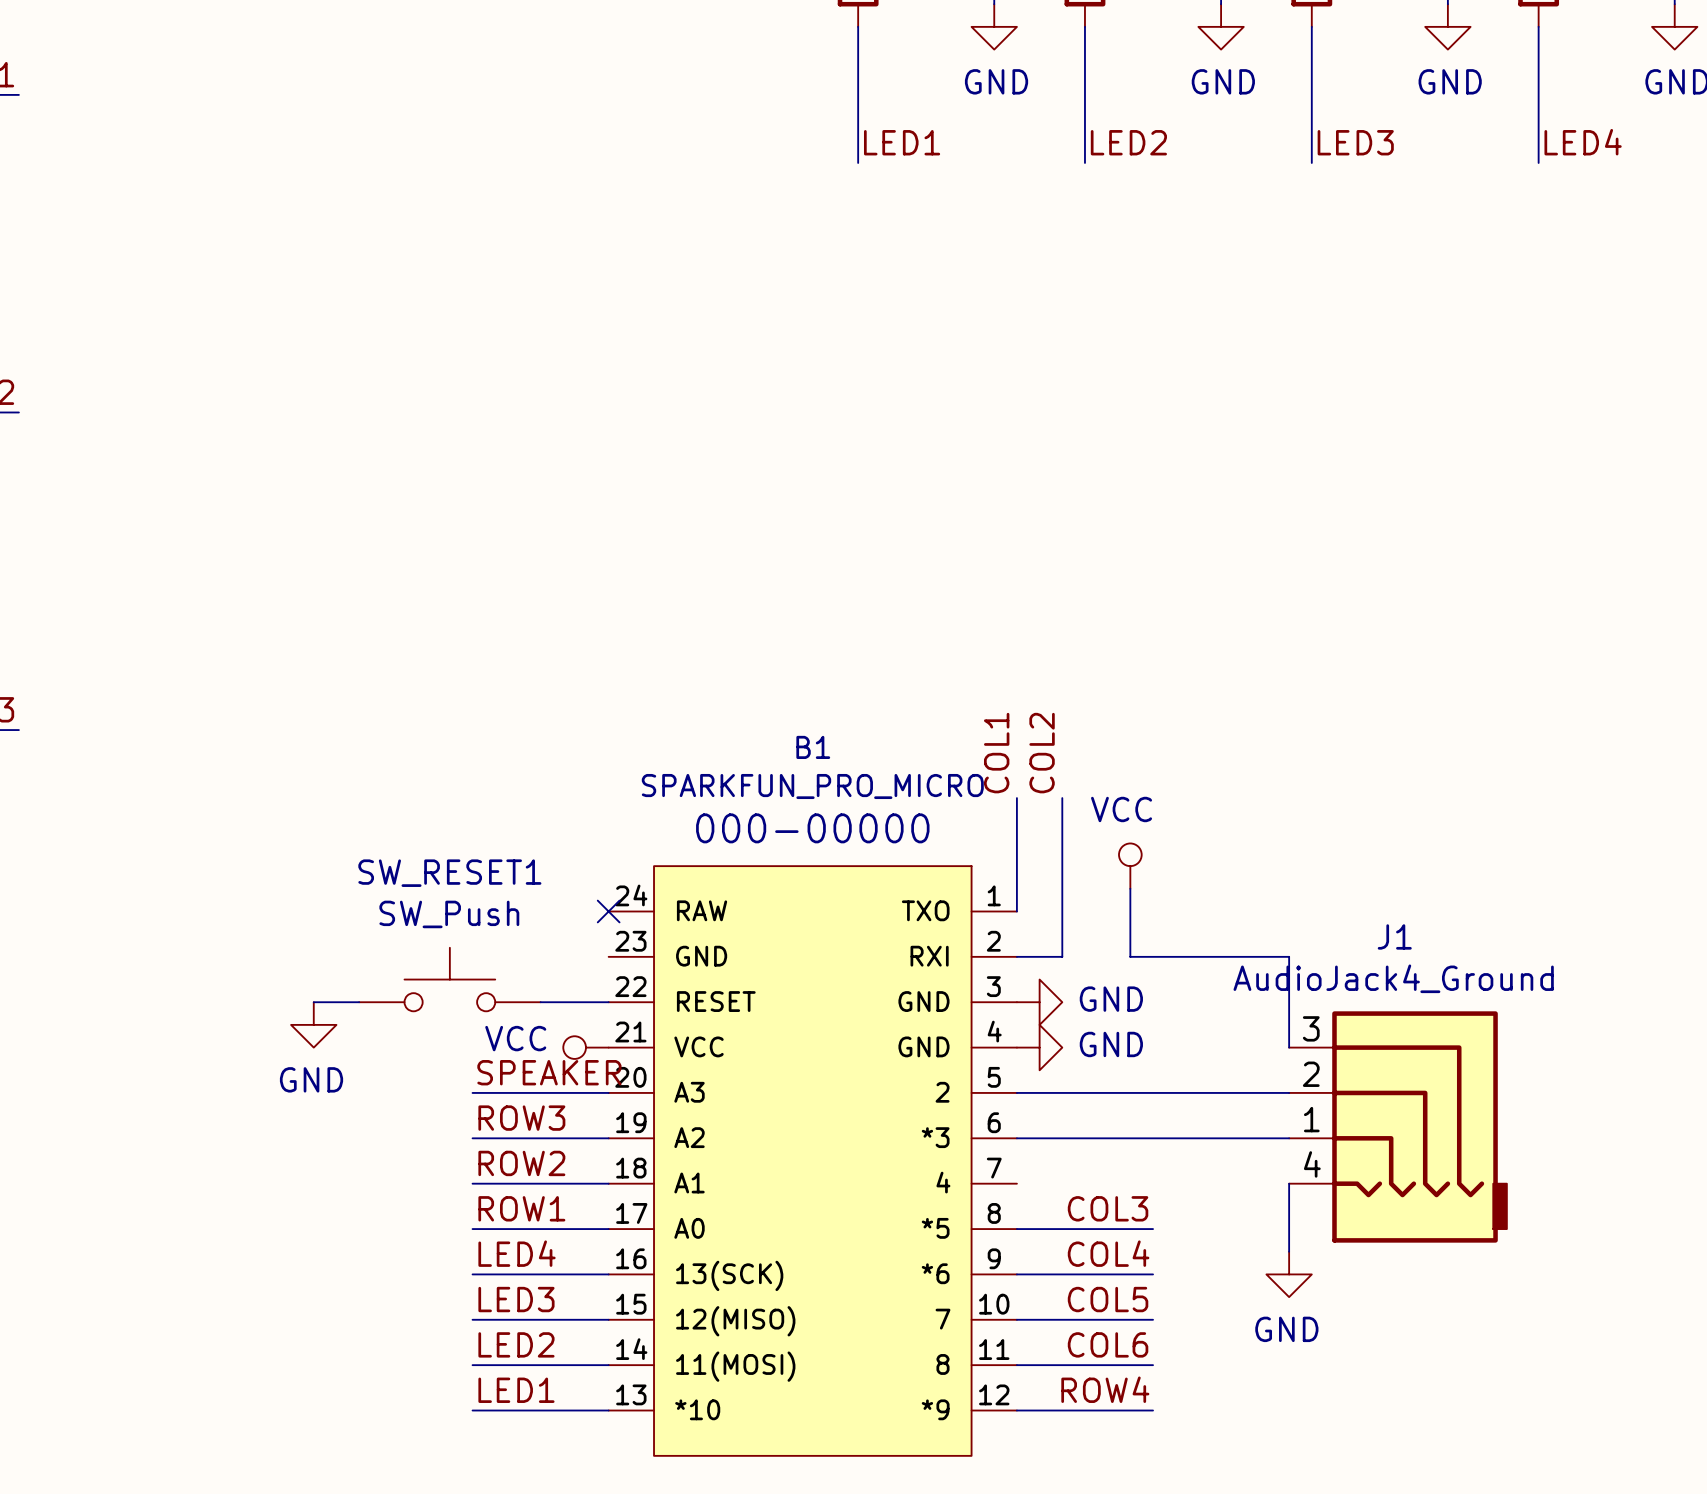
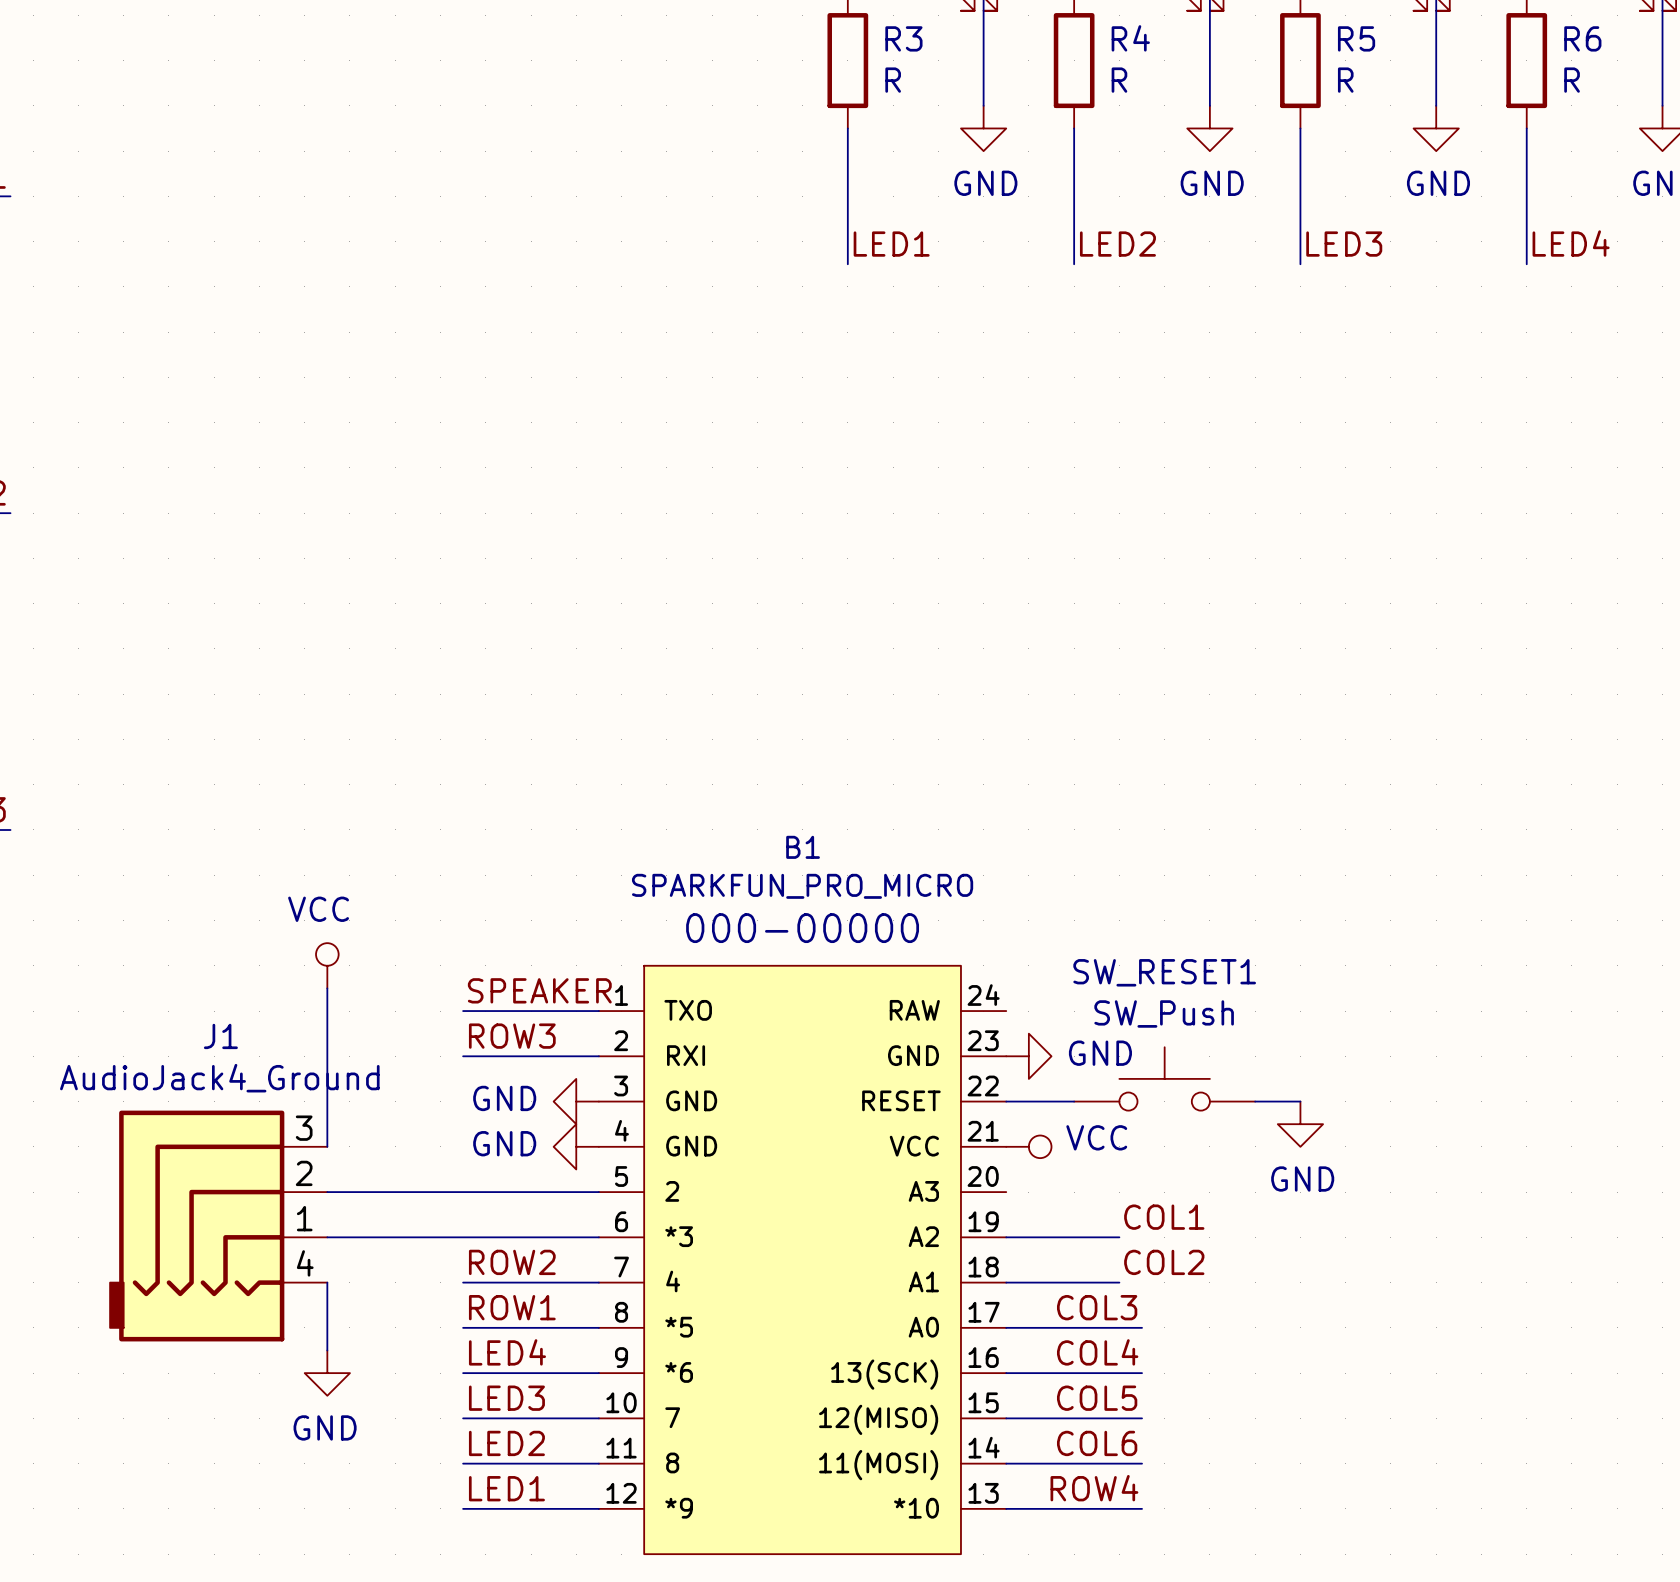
label rotation: 0° (996, 753) -> 90° clockwise (1164, 1217)
label position: COL1 (996, 753) -> COL1 (1164, 1217)
label rotation: 0° (1042, 753) -> 90° clockwise (1164, 1262)
label position: COL2 (1042, 753) -> COL2 (1164, 1262)
wire: (1016, 798) (1016, 911) -> none
wire: (1062, 798) (1062, 956) (1016, 956) -> none
power symbol: none -> VCC (327, 965)
power symbol: VCC (1130, 866) -> none
wire: none -> (327, 988) (327, 1146)
wire: (1130, 888) (1130, 956) (1289, 956) (1289, 1047) -> none
wire: none -> (463, 1011) (598, 1011)
no-connect mark: (608, 911) -> none
wire: none -> (463, 1056) (598, 1056)
SW_RESET1 position: (449, 979) -> (1164, 1078)
wire: (313, 1002) (359, 1002) -> none
wire: (540, 1002) (608, 1002) -> none
power symbol: none -> GND (576, 1101)
wire: none -> (1006, 1101) (1074, 1101)
power symbol position: GND (1039, 1002) -> GND (1028, 1056)
wire: none -> (1255, 1101) (1300, 1101)
power symbol: GND (313, 1024) -> none
power symbol: none -> GND (1300, 1124)
power symbol: VCC (585, 1047) -> GND (576, 1146)
power symbol: GND (1039, 1047) -> VCC (1028, 1146)
label position: SPEAKER (549, 1072) -> SPEAKER (539, 990)
wire: none -> (327, 1192) (463, 1192)
wire: (1016, 1092) (1289, 1092) -> none
label position: ROW3 (521, 1118) -> ROW3 (512, 1036)
J1 position: (1398, 1126) -> (218, 1226)
J1 flip: as is (1419, 1126) -> left-right (197, 1226)
wire: none -> (327, 1237) (463, 1237)
wire: (1130, 1138) (1289, 1138) -> none
B1 flip: as is (812, 1161) -> left-right (802, 1259)
wire: none -> (327, 1282) (327, 1350)
wire: none -> (1006, 1282) (1119, 1282)
wire: (1289, 1183) (1289, 1251) -> none
power symbol: none -> GND (327, 1373)
power symbol: GND (1289, 1274) -> none

